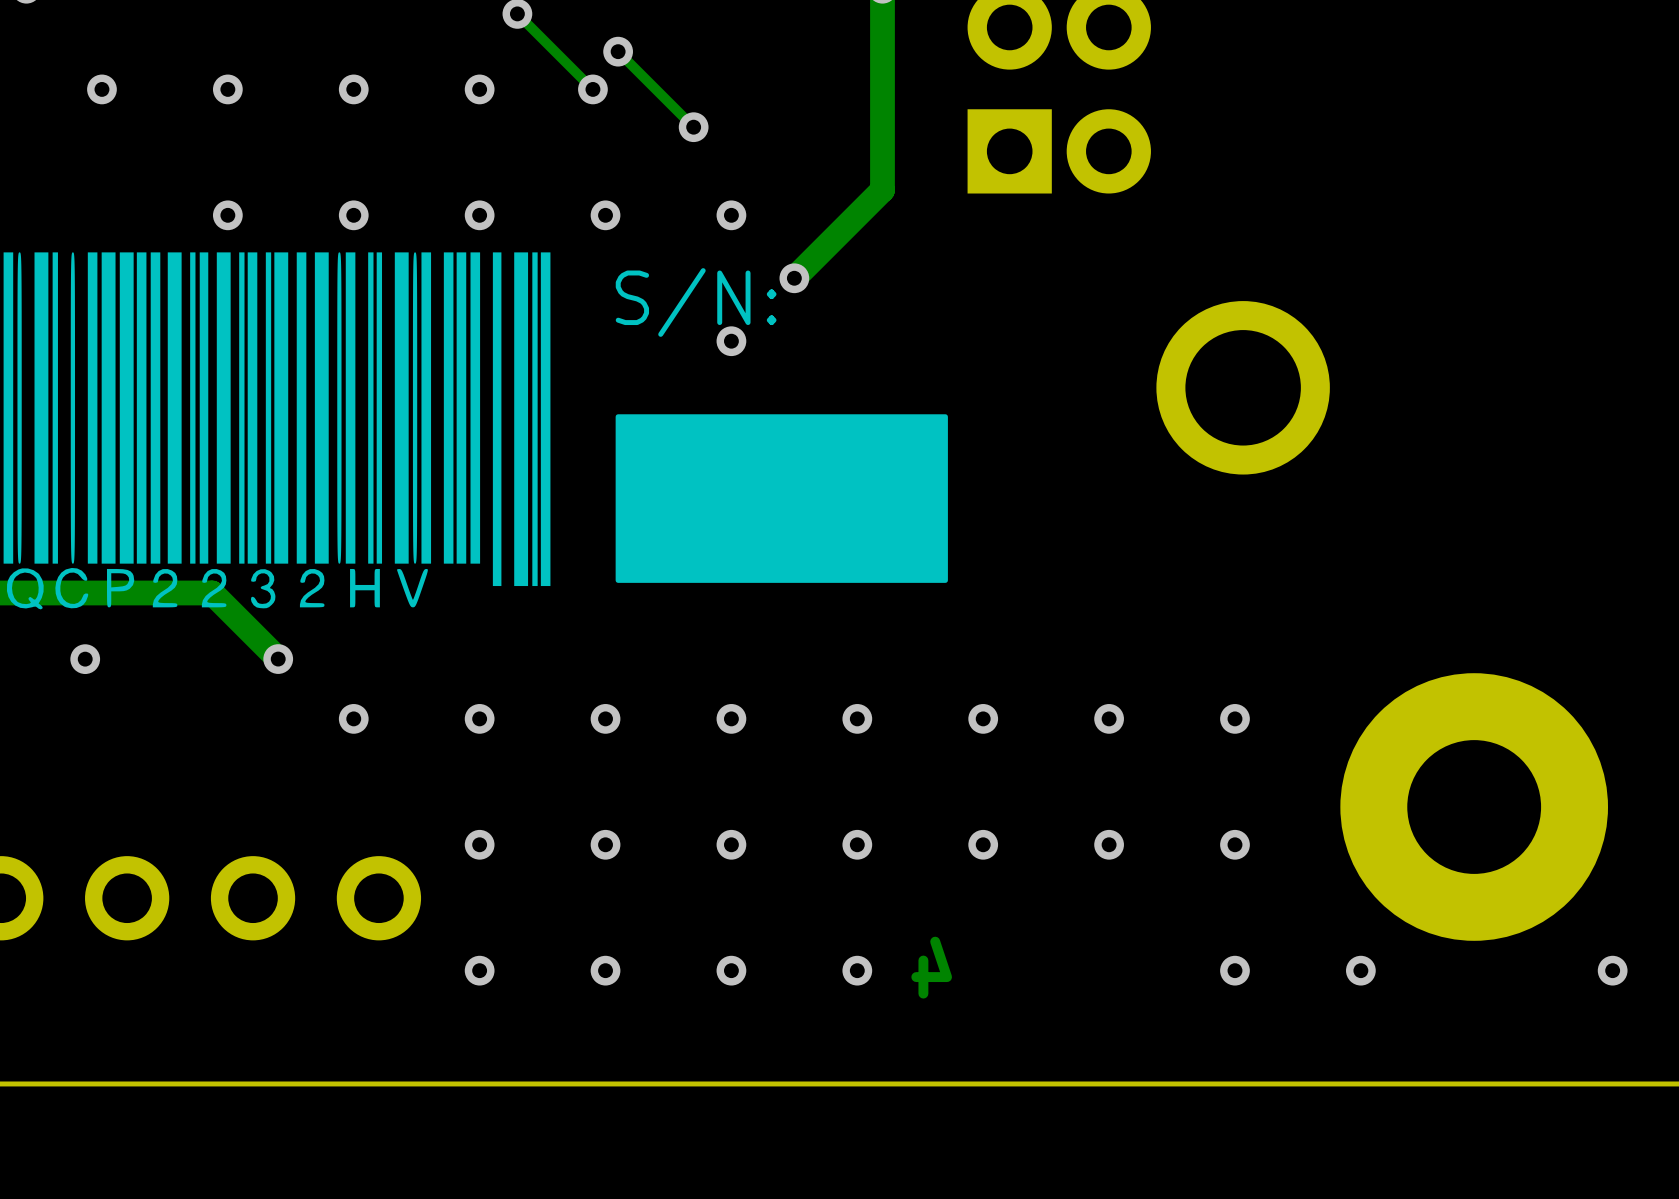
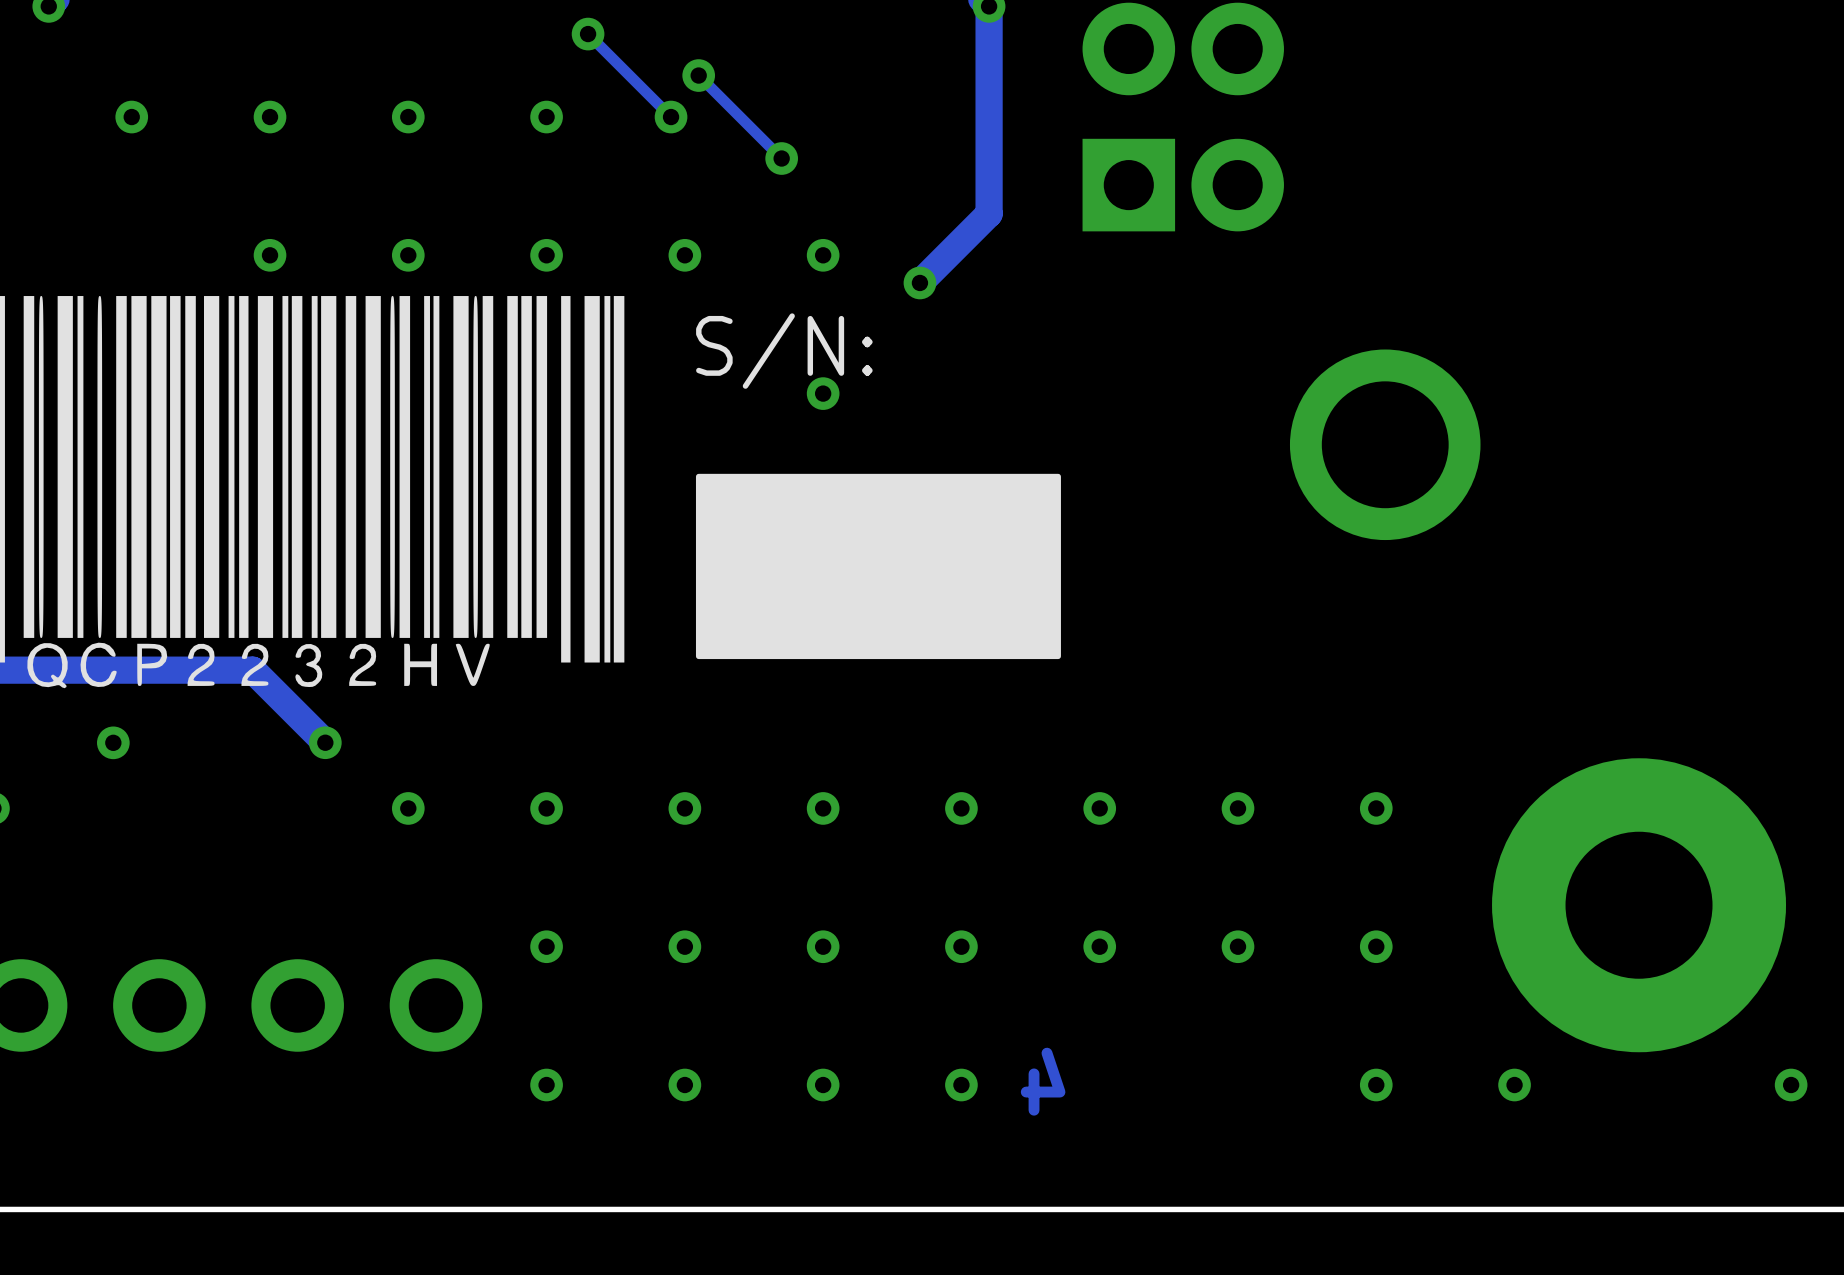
track: (882, 177) (882, 190) (794, 278) -> (989, 213) (919, 282)
via position: (794, 278) -> (919, 282)

